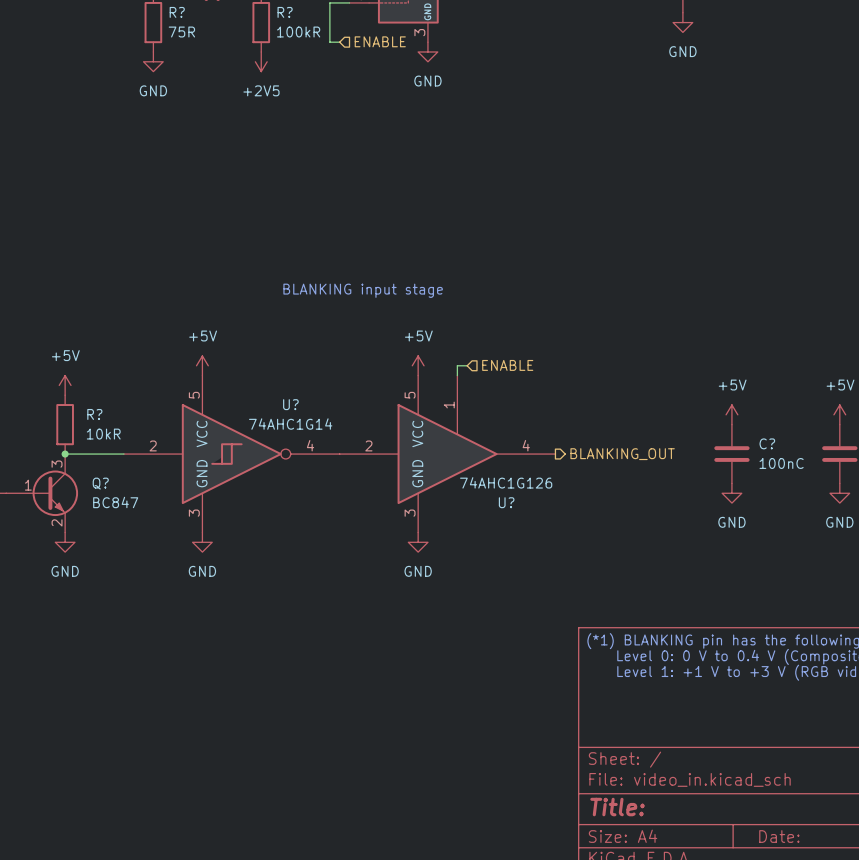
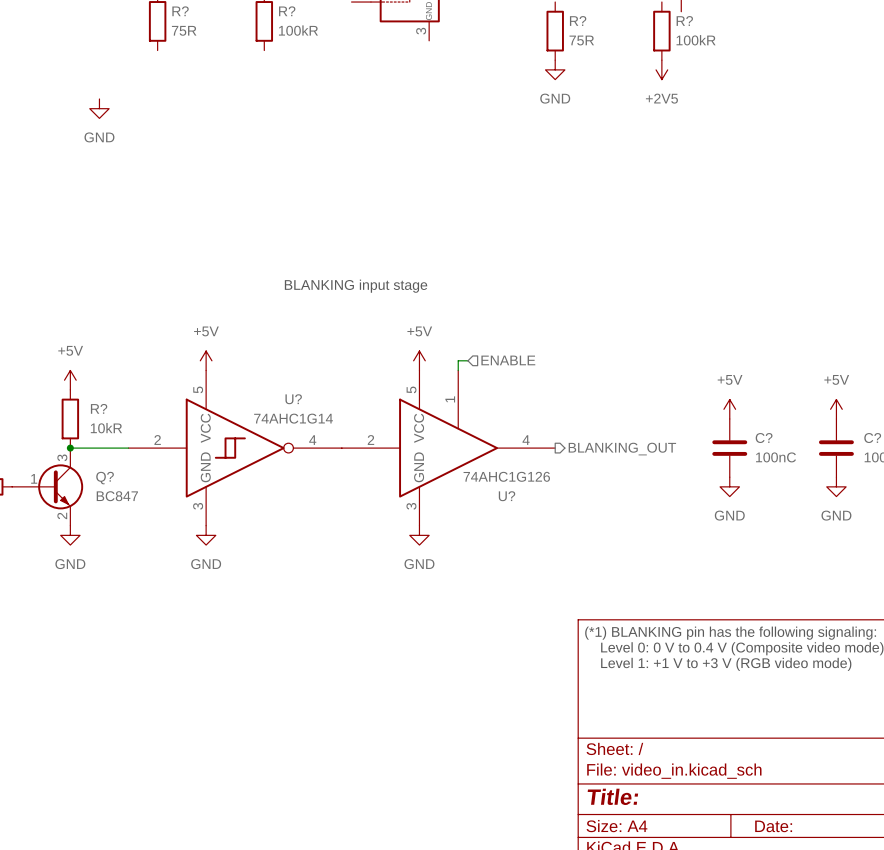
wire: (349, 2) (329, 2) (329, 42) (339, 42) -> none
power symbol: GND (682, 22) -> none
R?: none -> 75R (555, 31)
R?: none -> 100kR (661, 31)
hierarchical label: ENABLE (380, 41) -> none
power symbol: GND (427, 51) -> none
power symbol position: GND (153, 61) -> GND (99, 108)
power symbol: +2V5 (261, 61) -> none
power symbol: none -> GND (555, 69)
power symbol: none -> +2V5 (661, 69)

